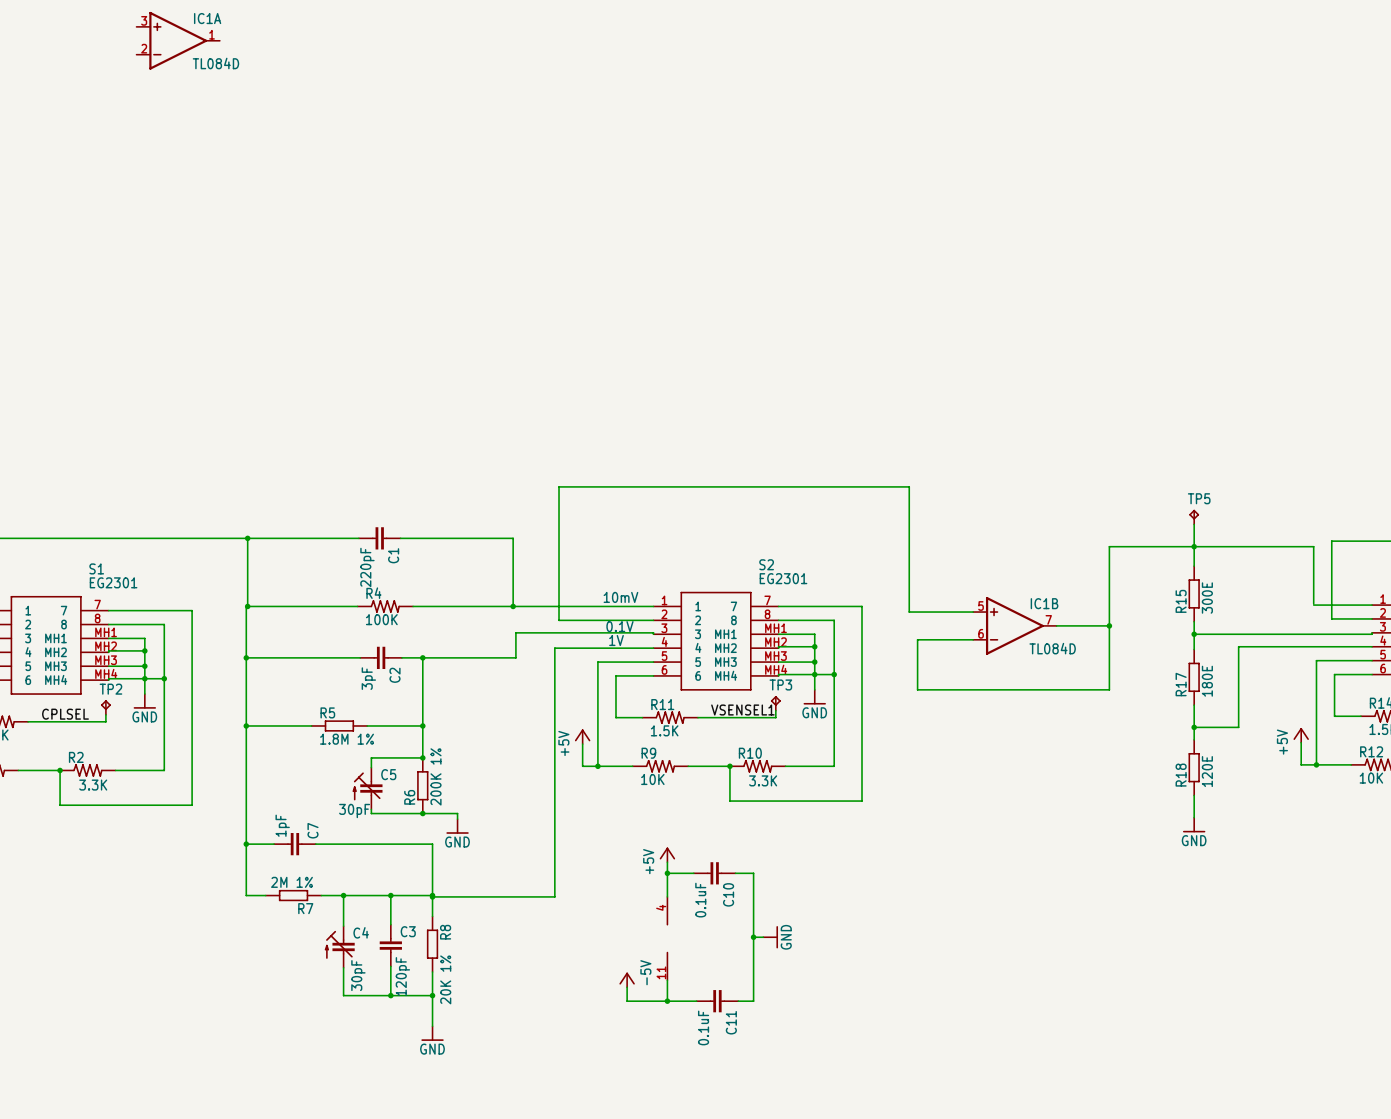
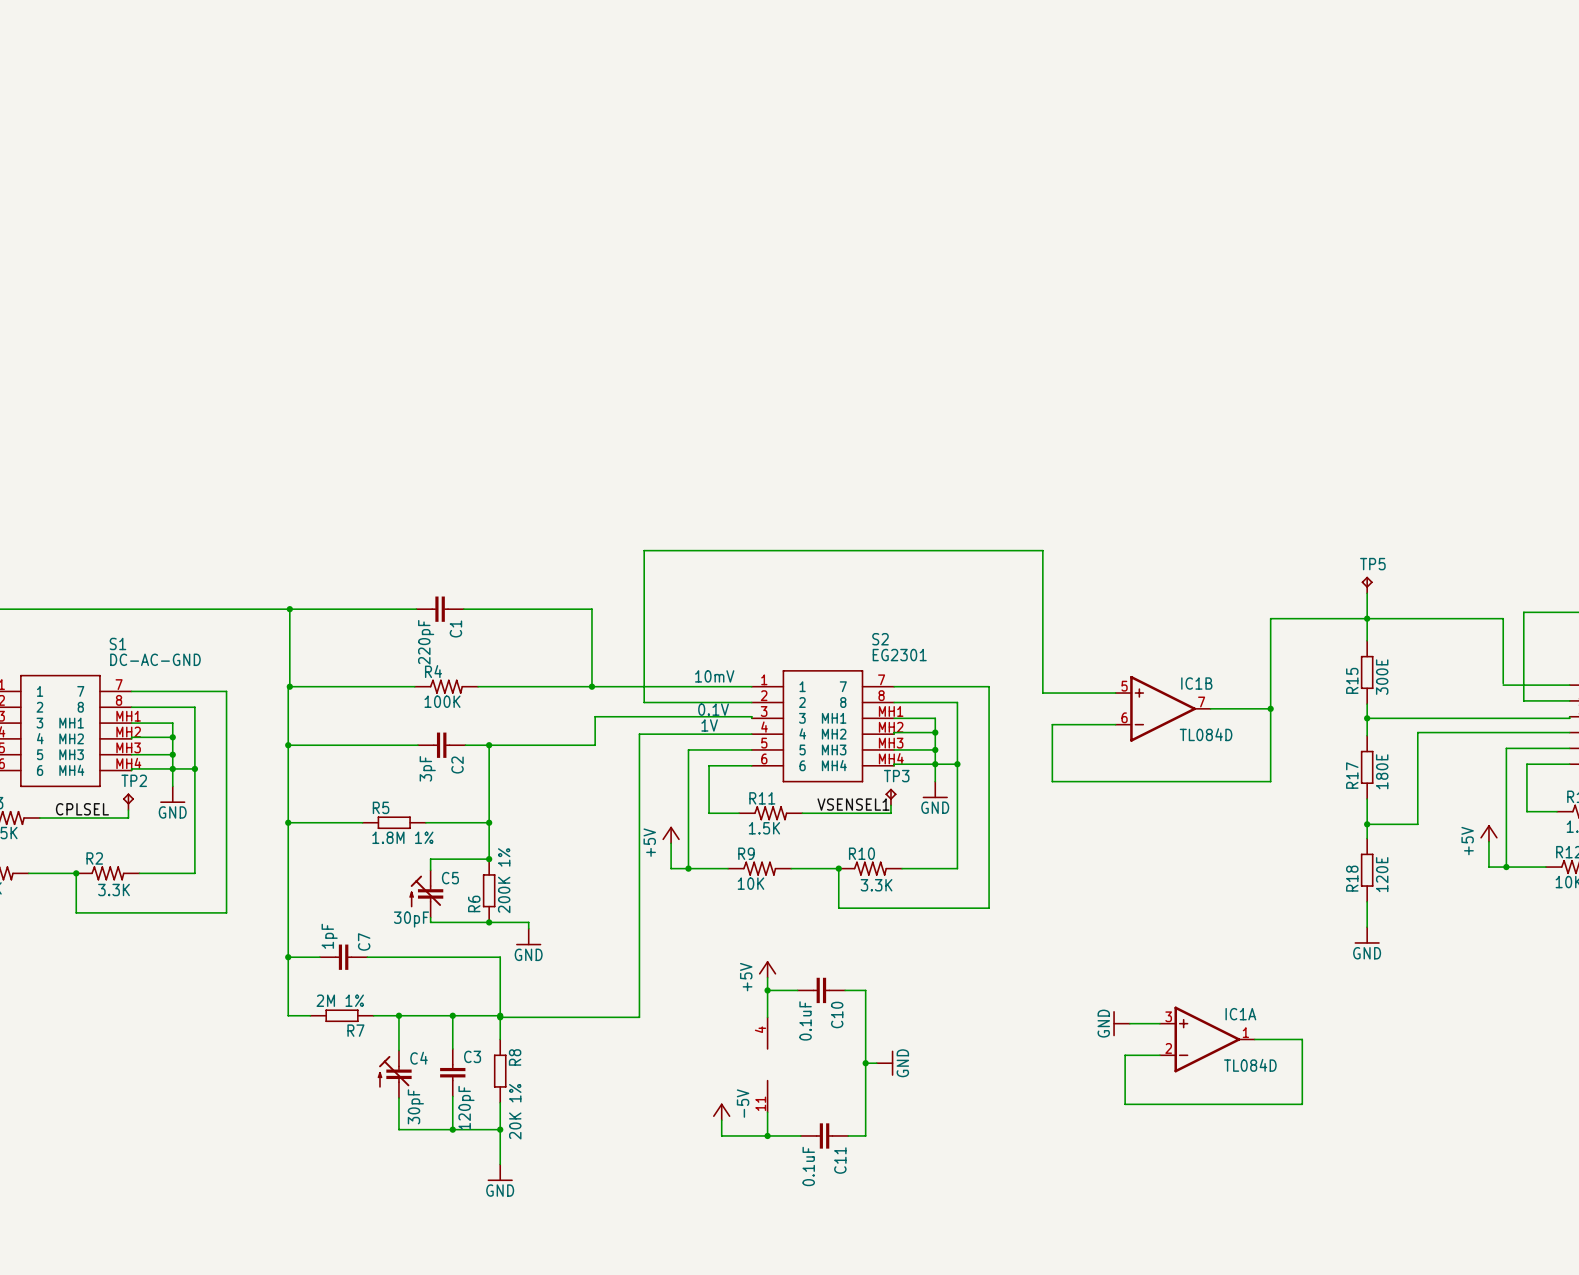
IC1A position: (178, 40) -> (1207, 1039)
S1 value: EG2301 (113, 582) -> DC-AC-GND (155, 659)
power symbol: none -> GND (1121, 1023)
wire: none -> (1129, 1023) (1159, 1023)
wire: none -> (1254, 1039) (1302, 1039) (1302, 1104) (1125, 1104) (1125, 1055) (1159, 1055)

